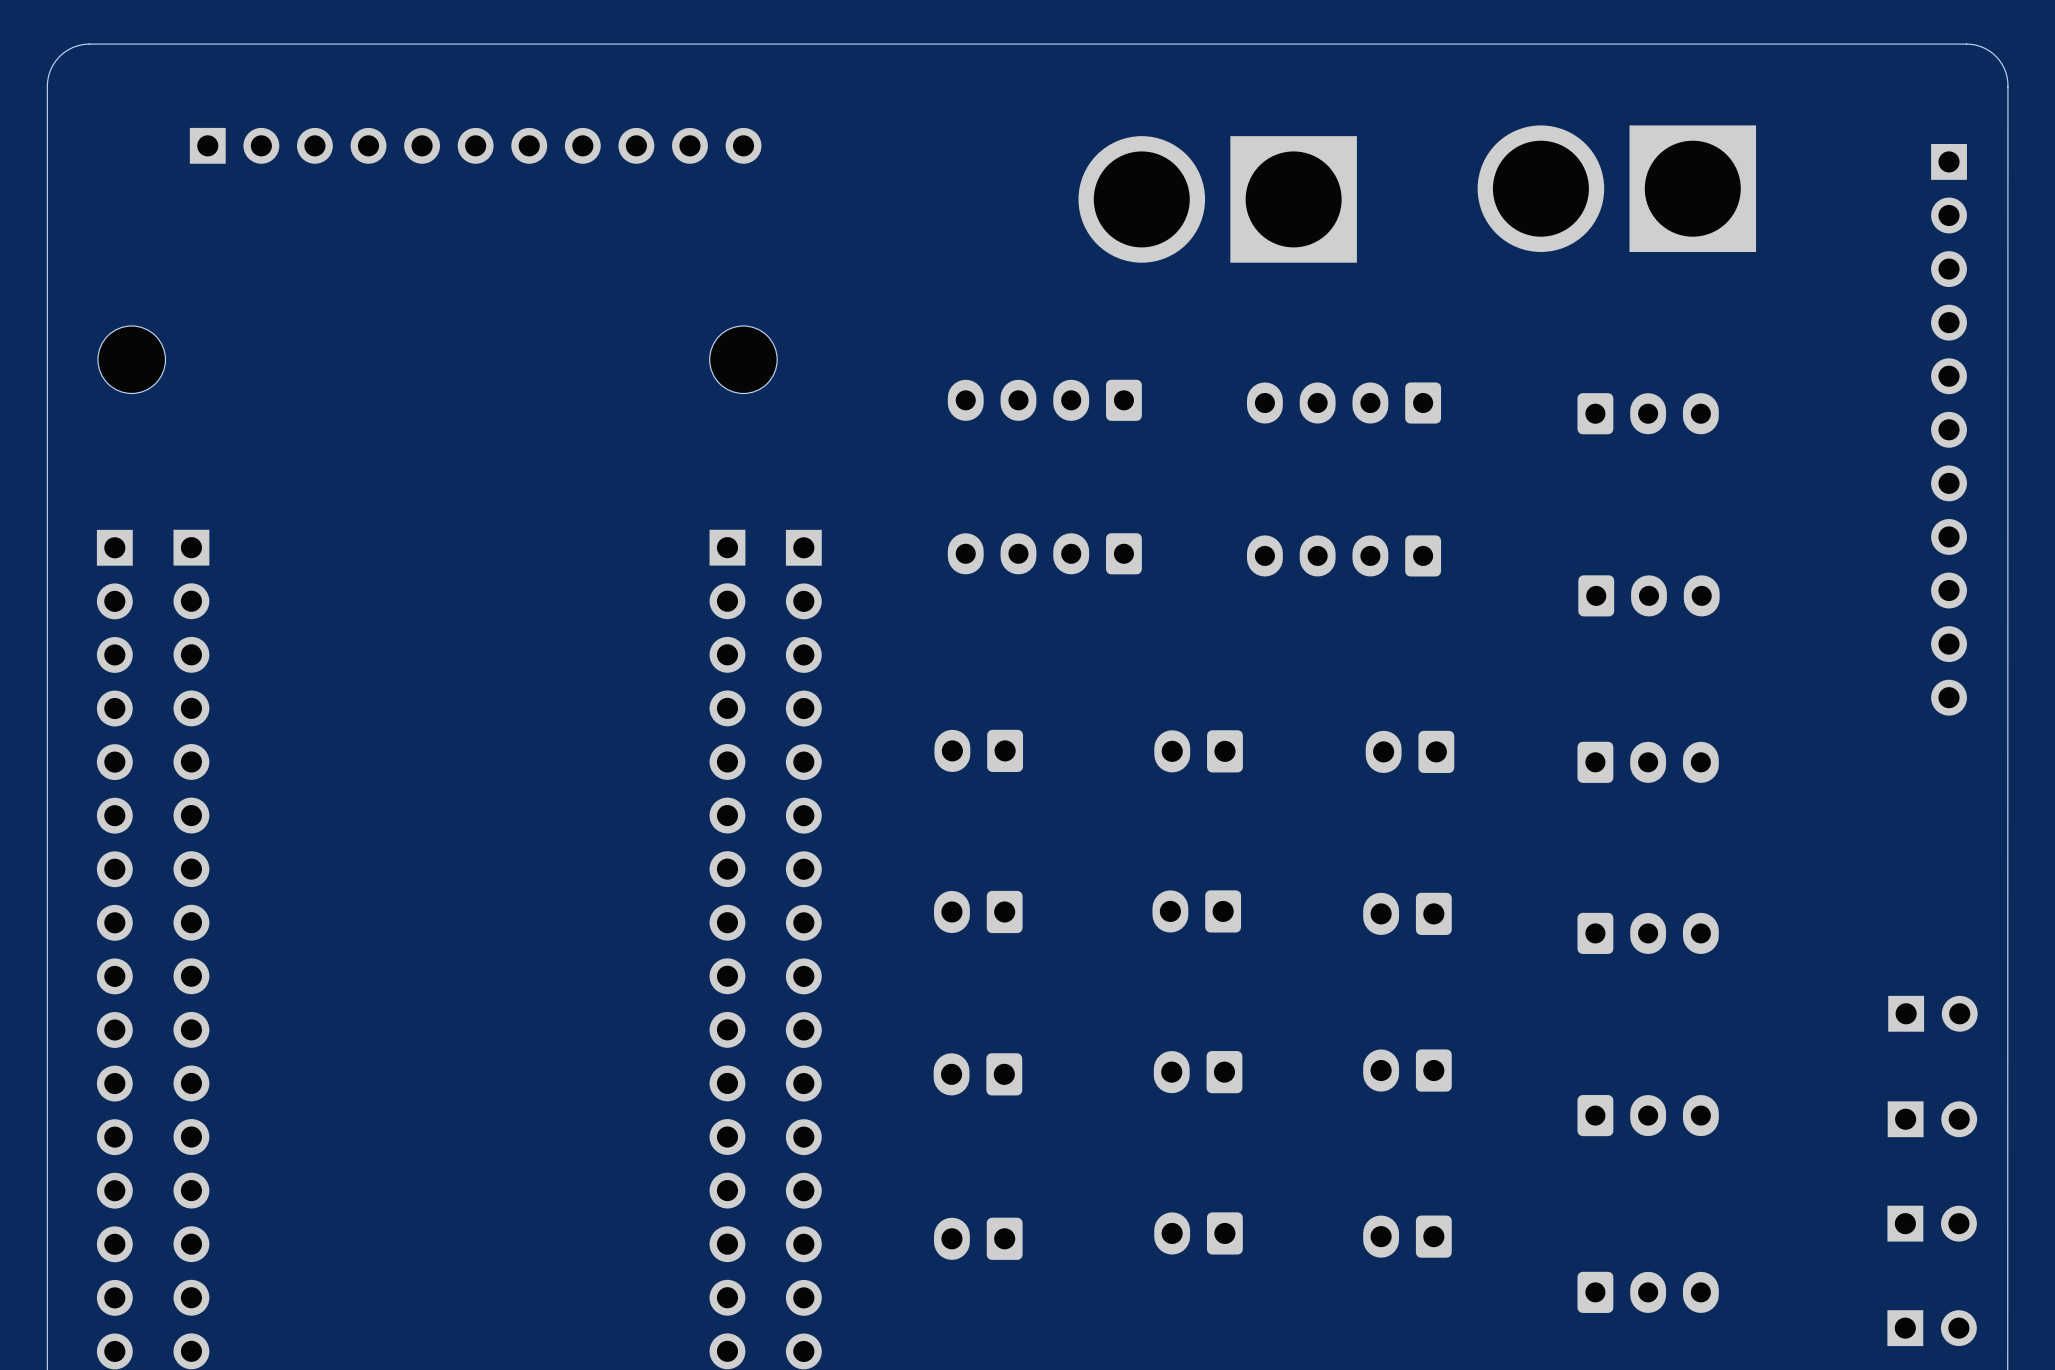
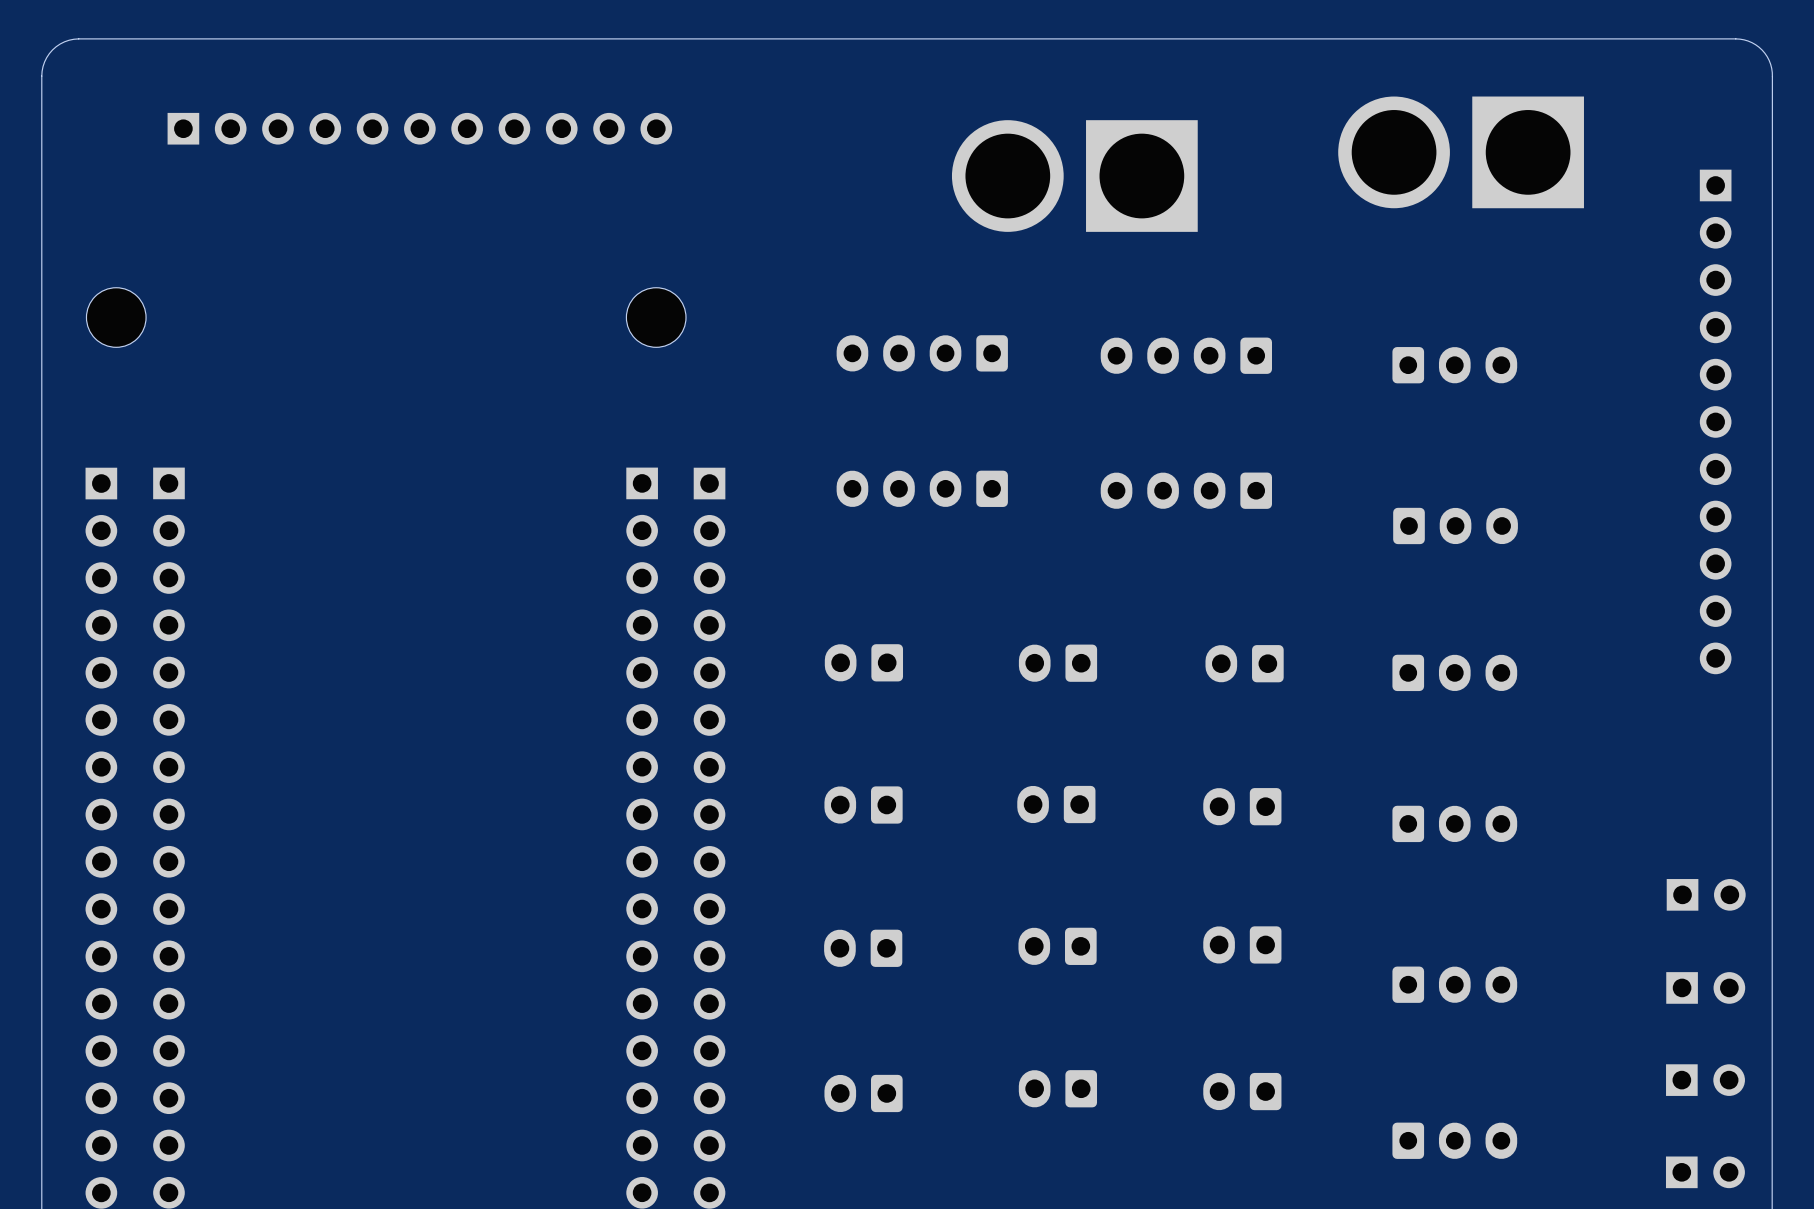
part position: (1616, 188) -> (1461, 152)
part position: (1949, 429) -> (1715, 421)

